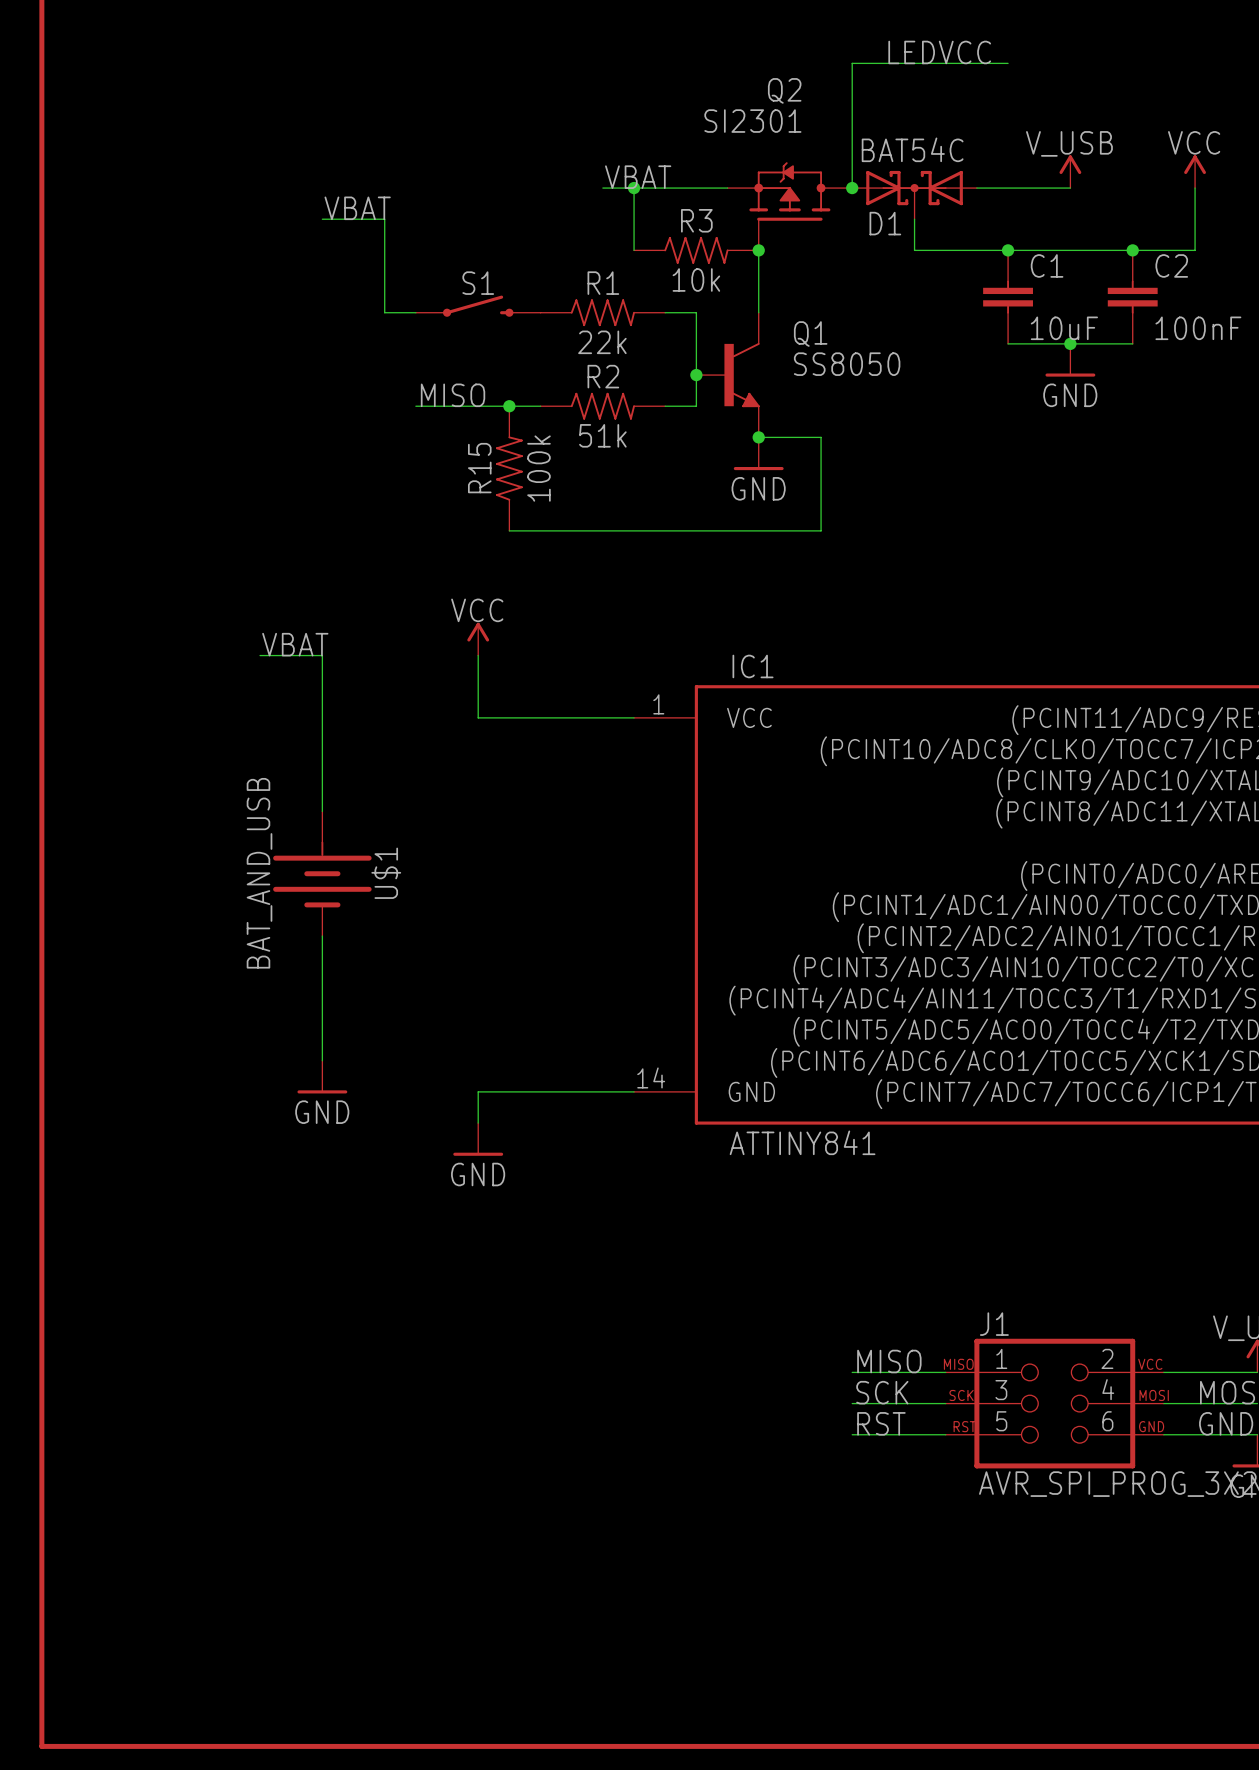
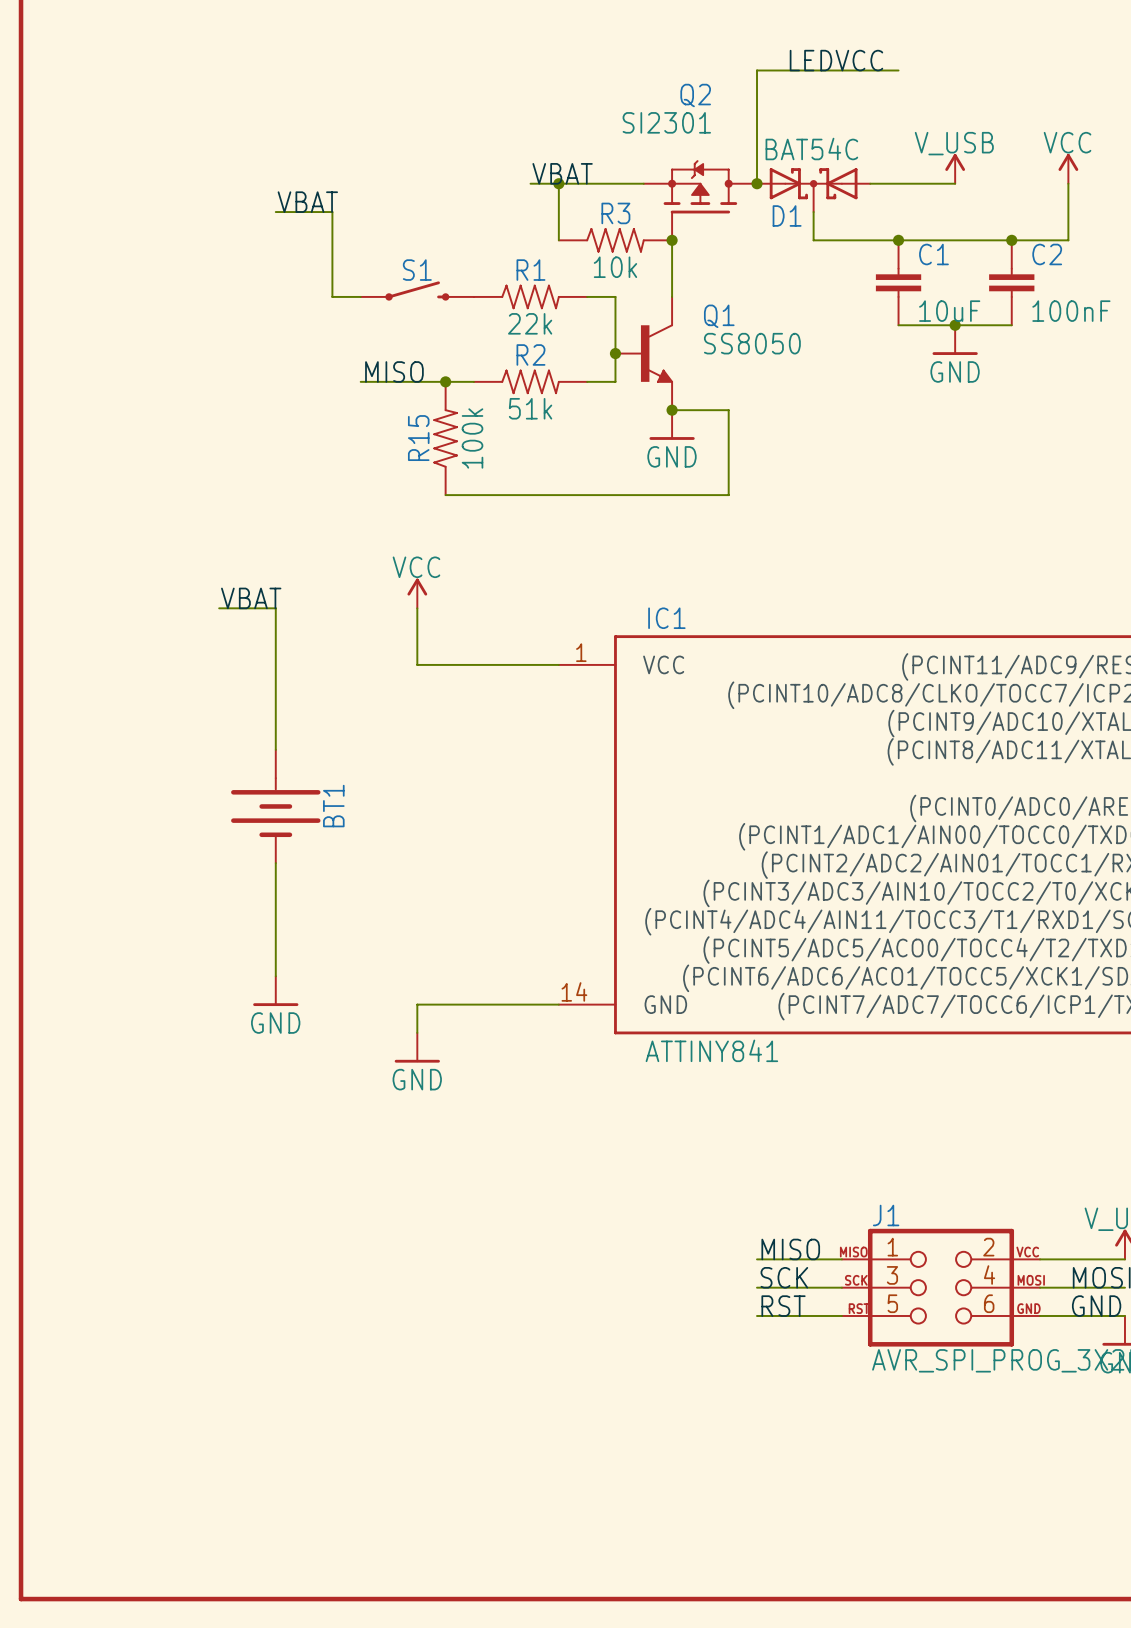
U$1 value: BAT_AND_USB (259, 873) -> none
U$1 name: U$1 (386, 873) -> BT1 (333, 806)

